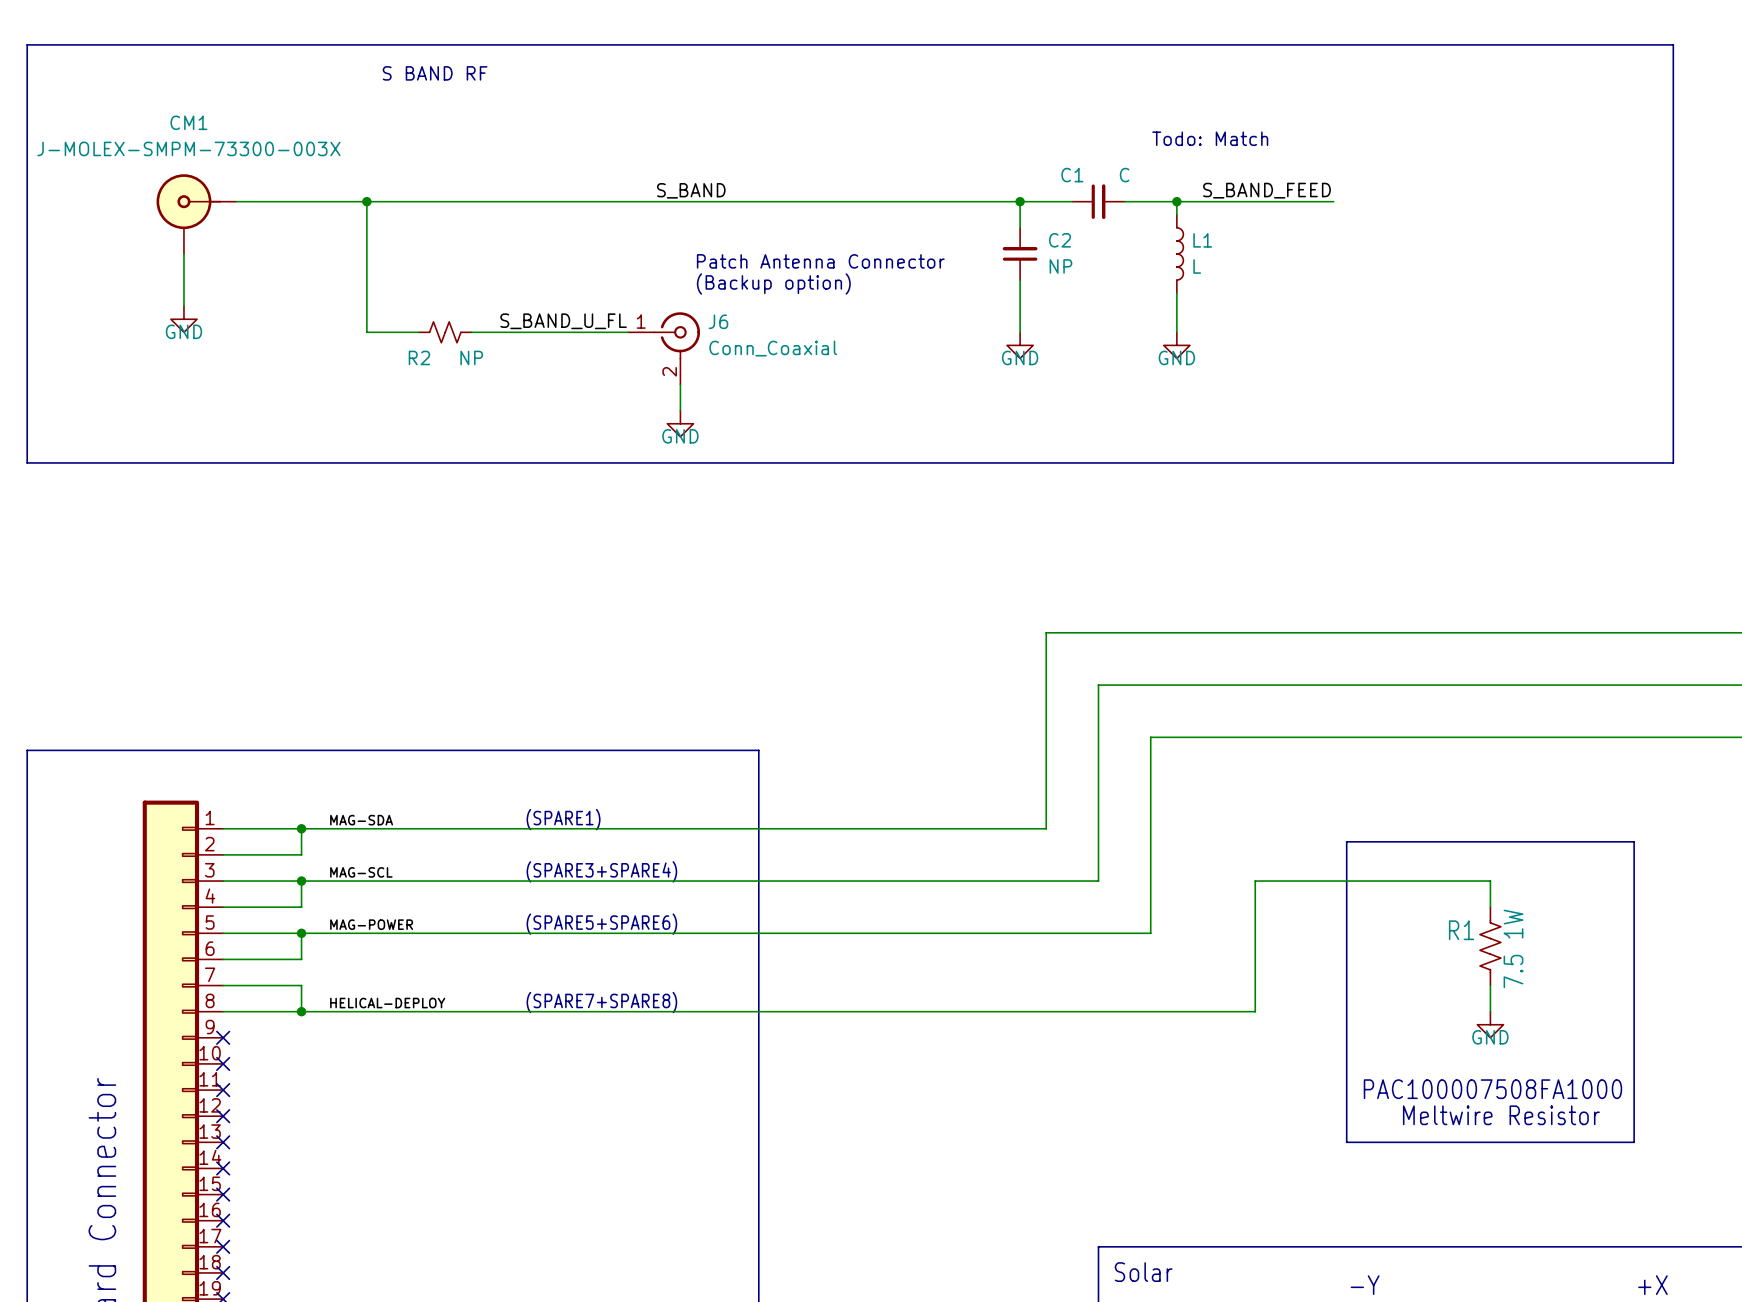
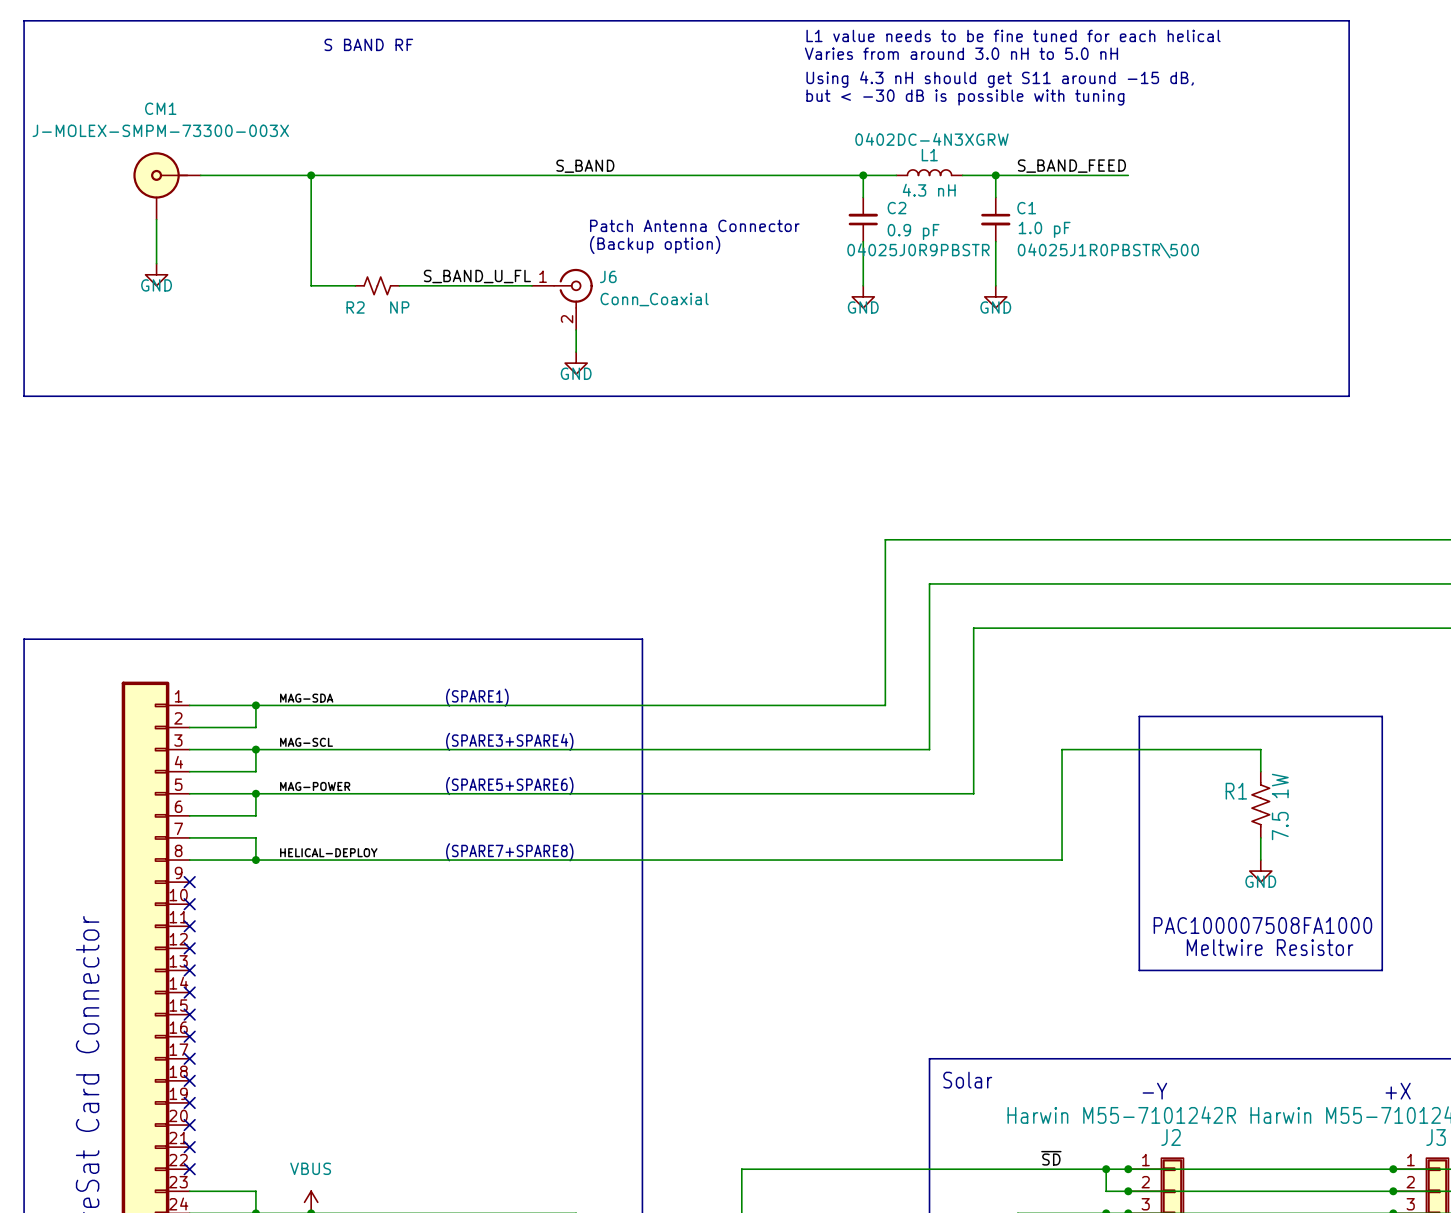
text: none -> L1 value needs to be fine tuned for each helical (1013, 35)
line: (27, 44) (1673, 44) (1673, 462) (1594, 462) -> (24, 42) (24, 20) (1349, 20) (1349, 396)
text: none -> Varies from around 3.0 nH to 5.0 nH (961, 53)
text position: S BAND RF (435, 73) -> S BAND RF (368, 44)
text: none -> Using 4.3 nH should get S11 around -15 dB, (1000, 79)
text: none -> but < -30 dB is possible with tuning (965, 97)
text: Todo: Match (1210, 138) -> none
L1 text: none -> 0402DC-4N3XGRW (931, 139)
C1 value: C (1124, 175) -> 1.0 pF (1044, 229)
C1 rotation: 0° (1098, 201) -> 90° clockwise (995, 219)
C1 position: (1098, 201) -> (995, 219)
L1 rotation: 0° (1180, 253) -> 90° counterclockwise (929, 172)
L1 position: (1180, 253) -> (929, 172)
C2 value: NP (1060, 266) -> 0.9 pF (913, 231)
L1 value: L (1197, 266) -> 4.3 nH (929, 190)
C2 text: none -> 04025J0R9PBSTR (918, 249)
C1 text: none -> 04025J1R0PBSTR\500 (1108, 250)

